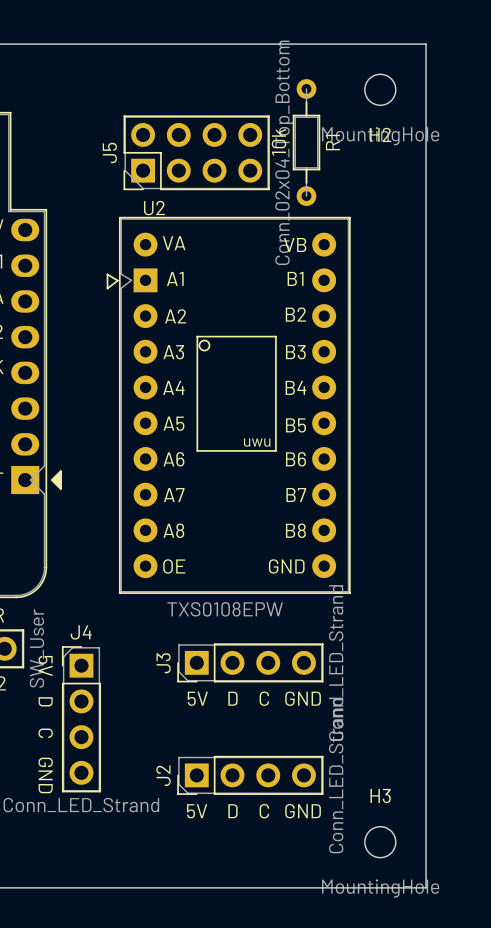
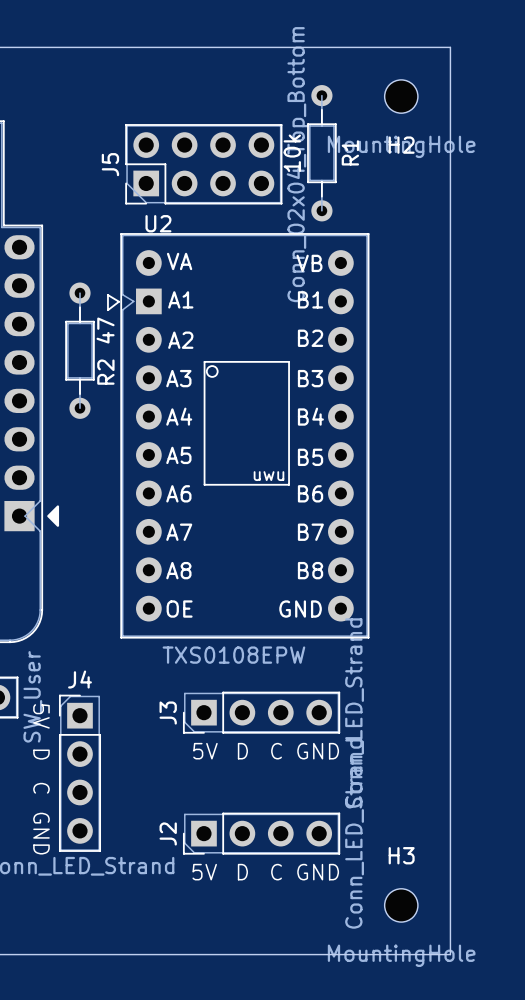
R2: none -> 47 (80, 350)

